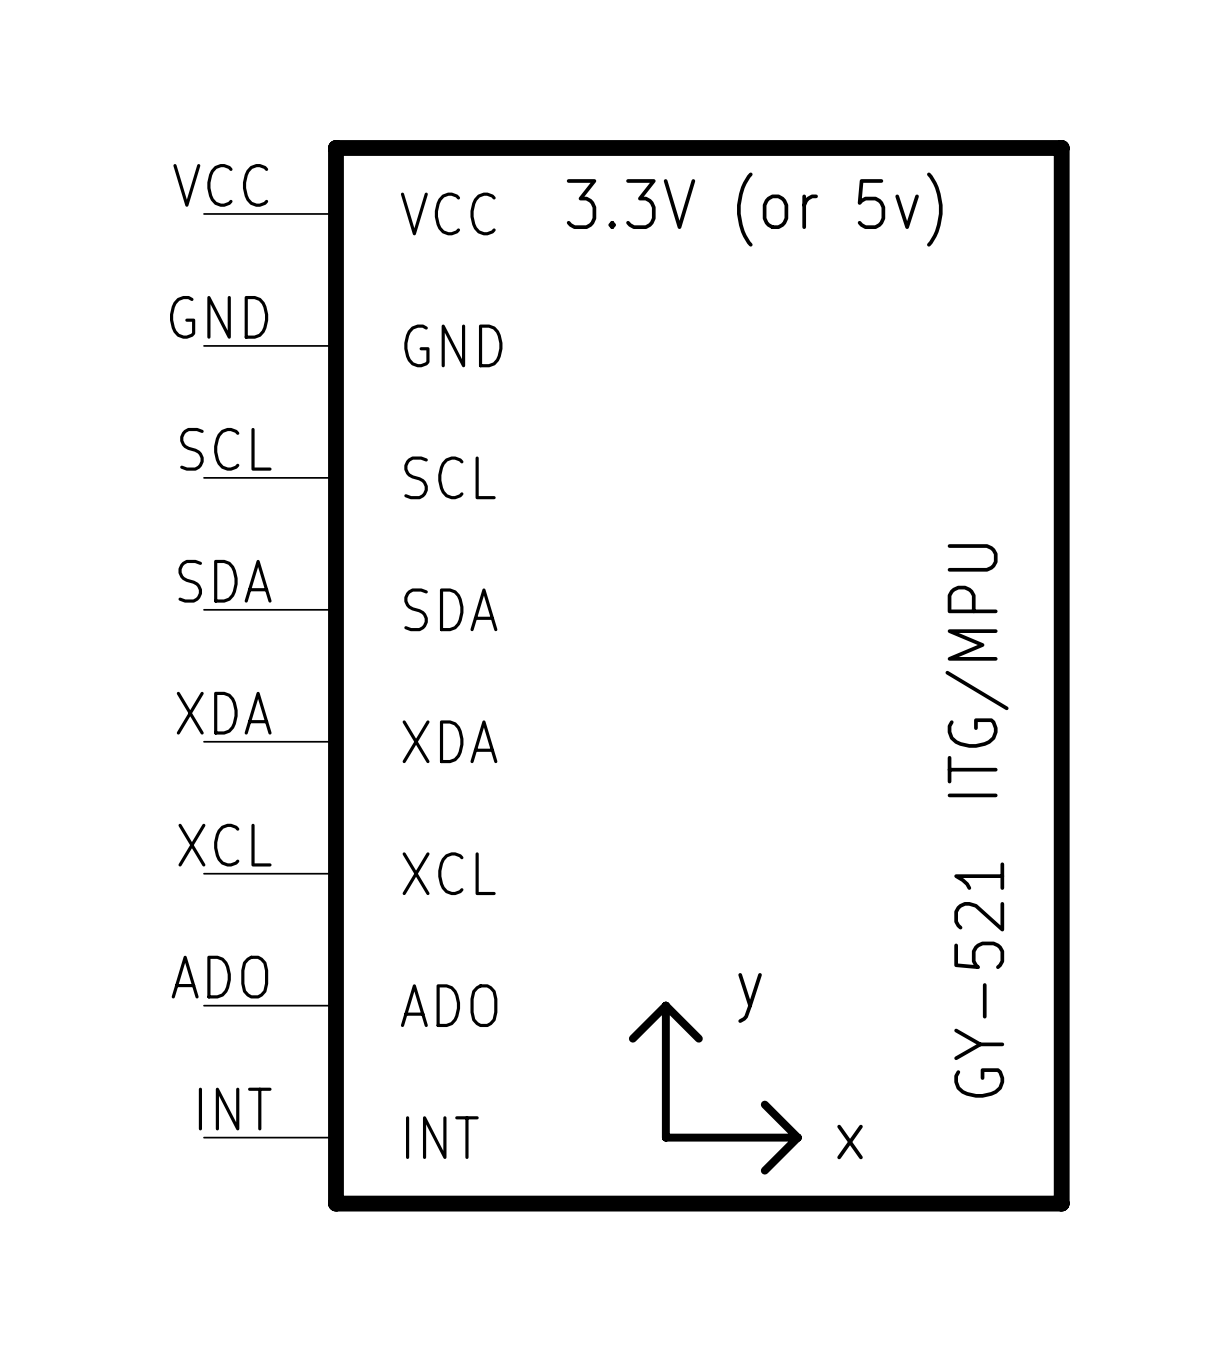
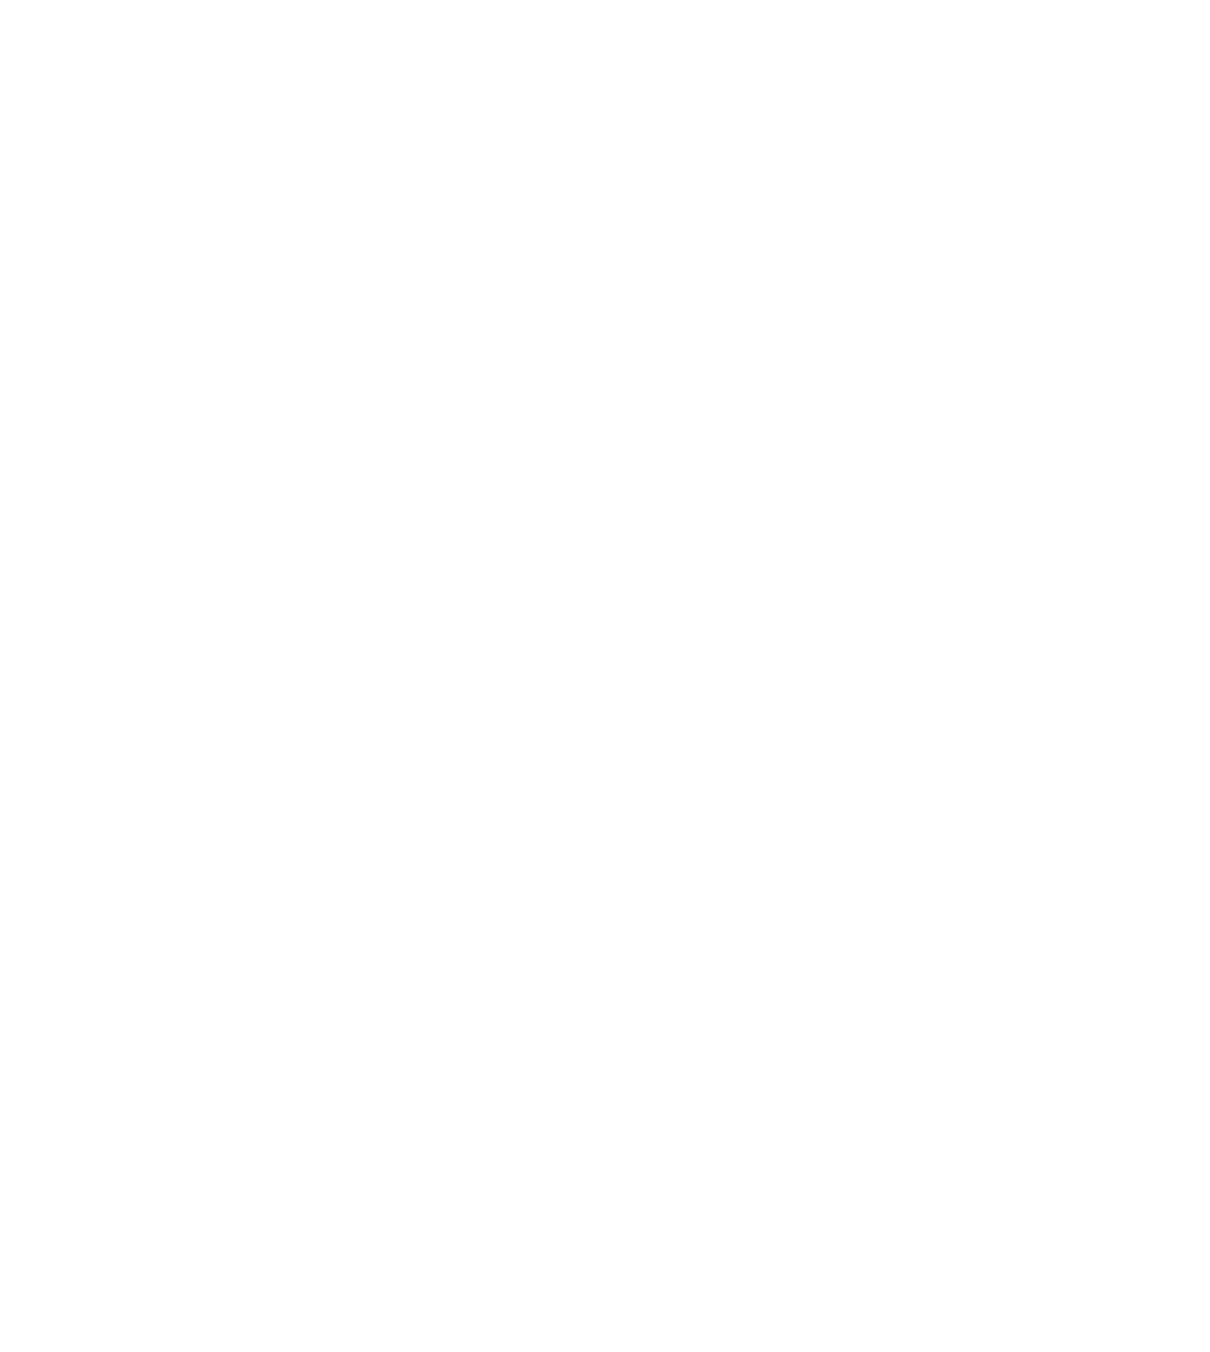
part: (636, 675) -> none

